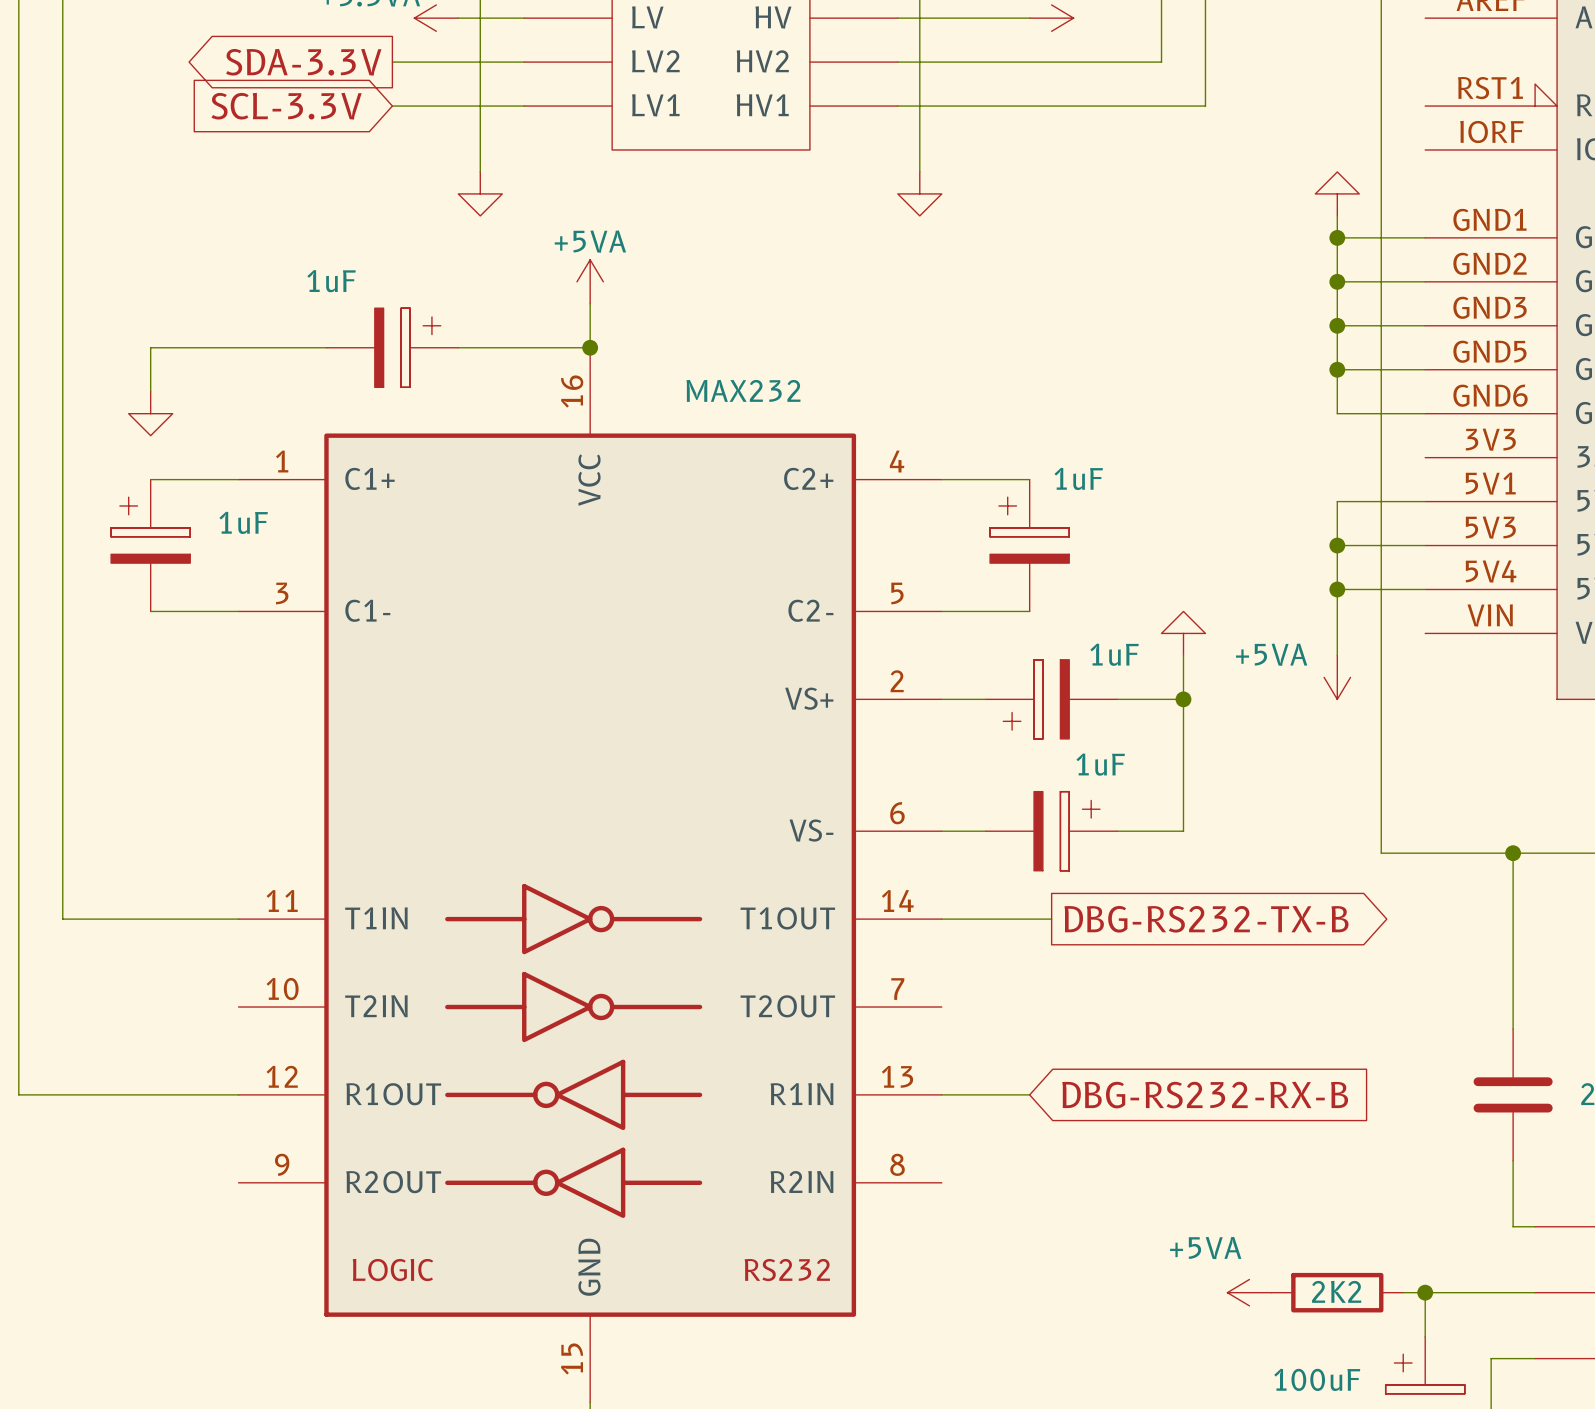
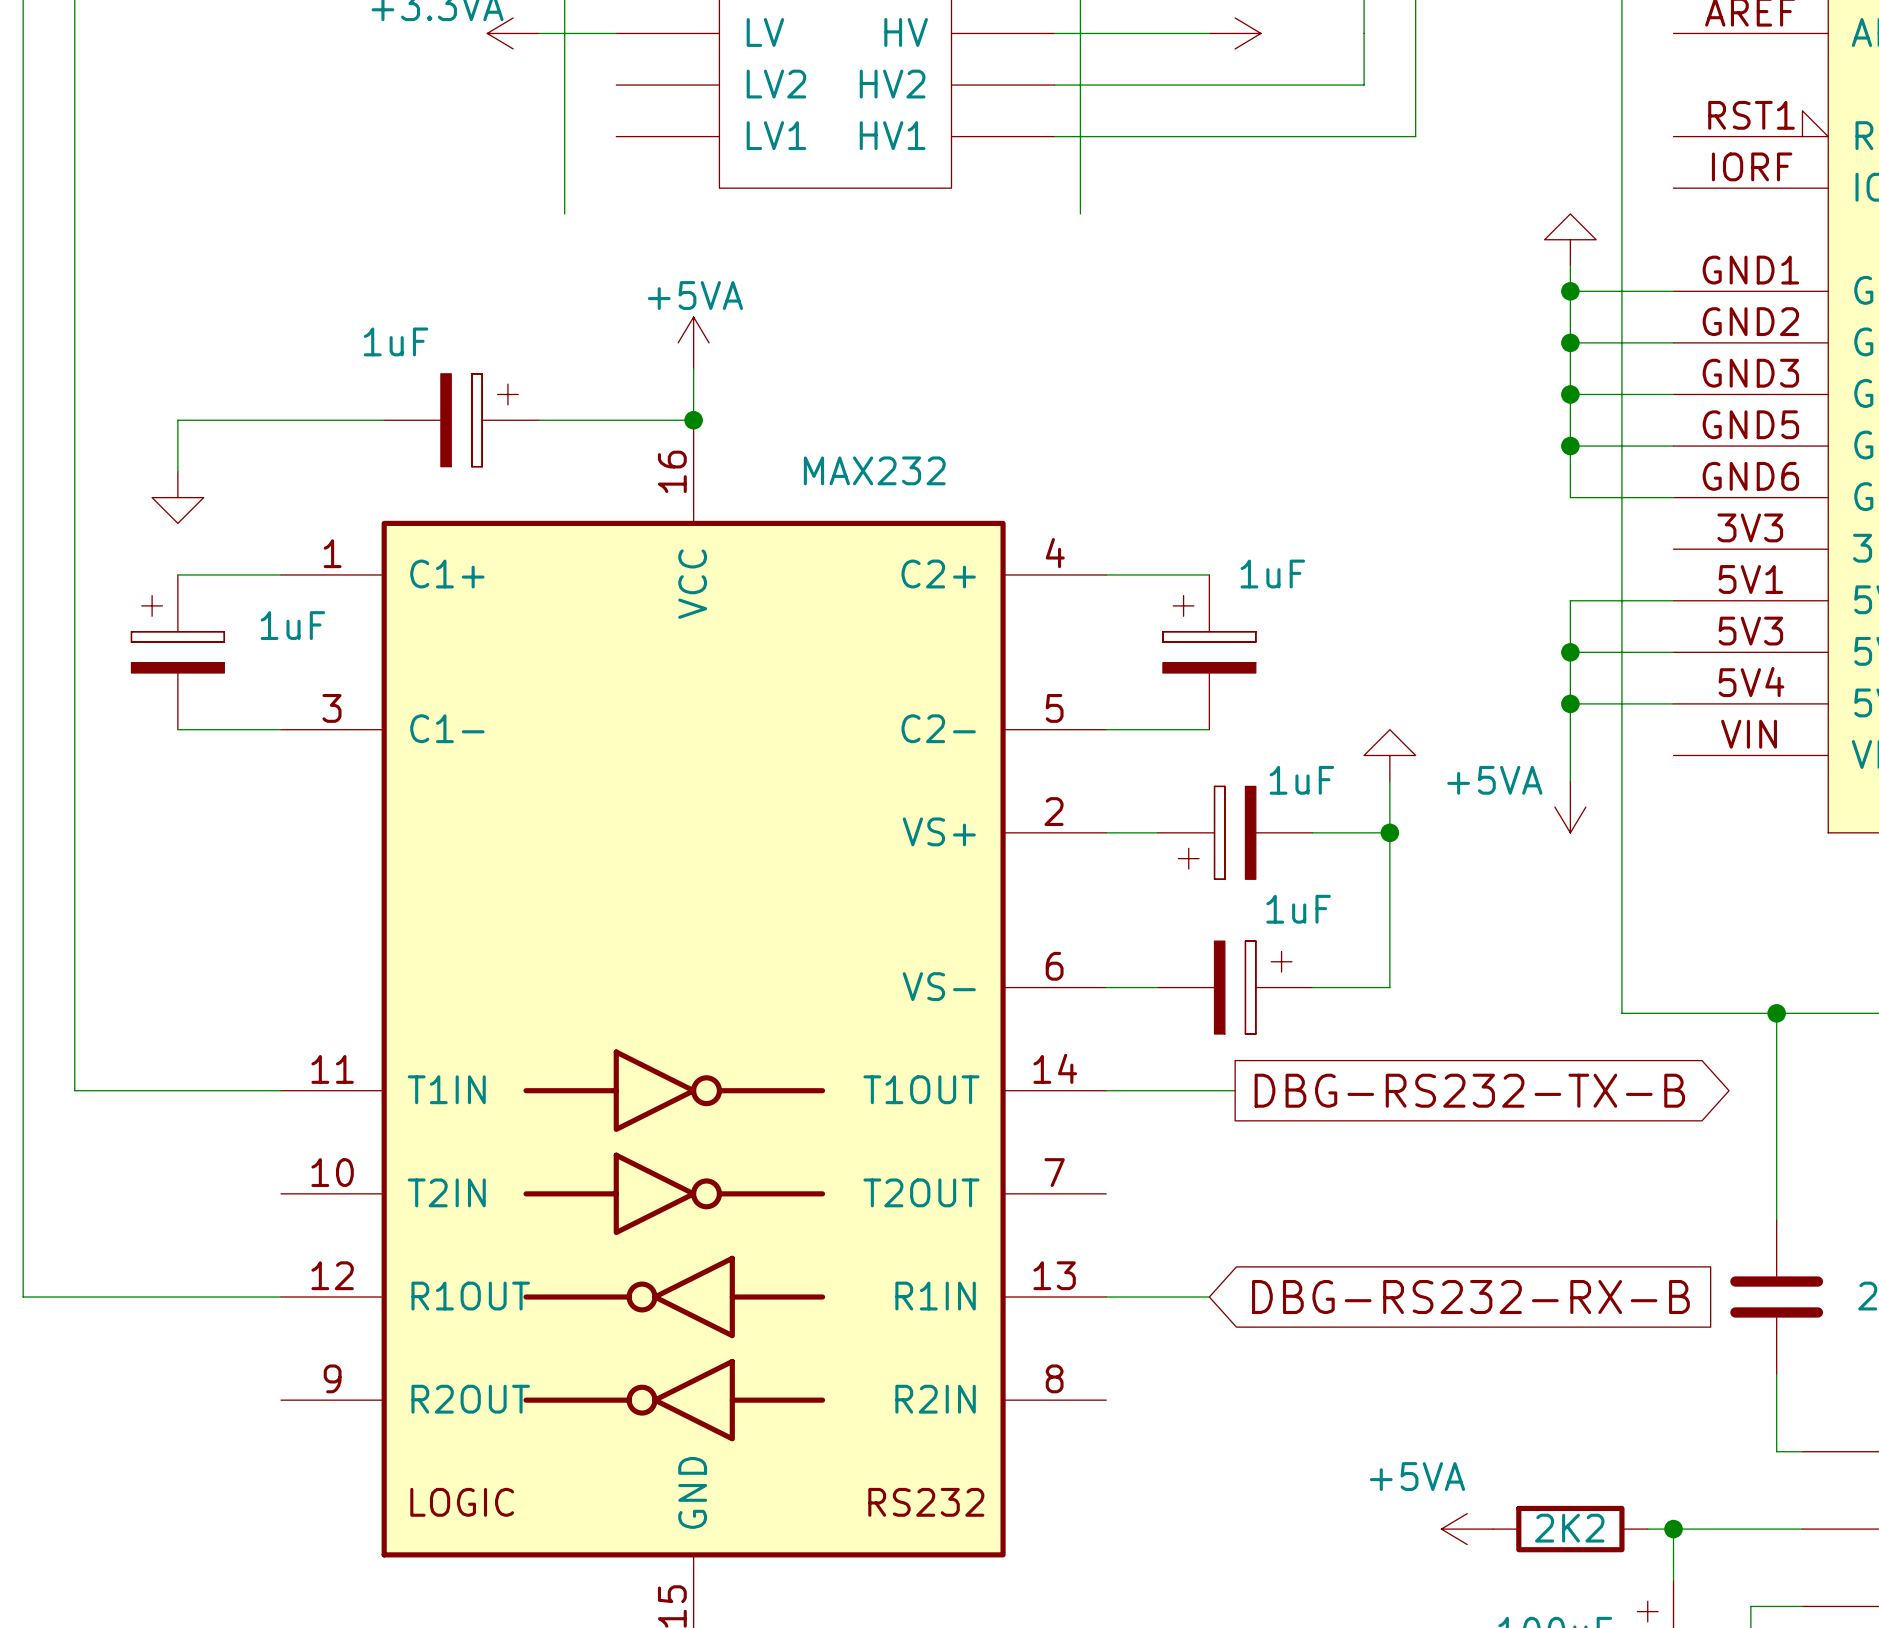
global label: SDA-3.3V (303, 62) -> none
wire: (392, 62) (524, 62) -> none
global label: SCL-3.3V (286, 106) -> none
wire: (392, 106) (524, 106) -> none
power symbol: (480, 193) -> none
power symbol: (919, 193) -> none

